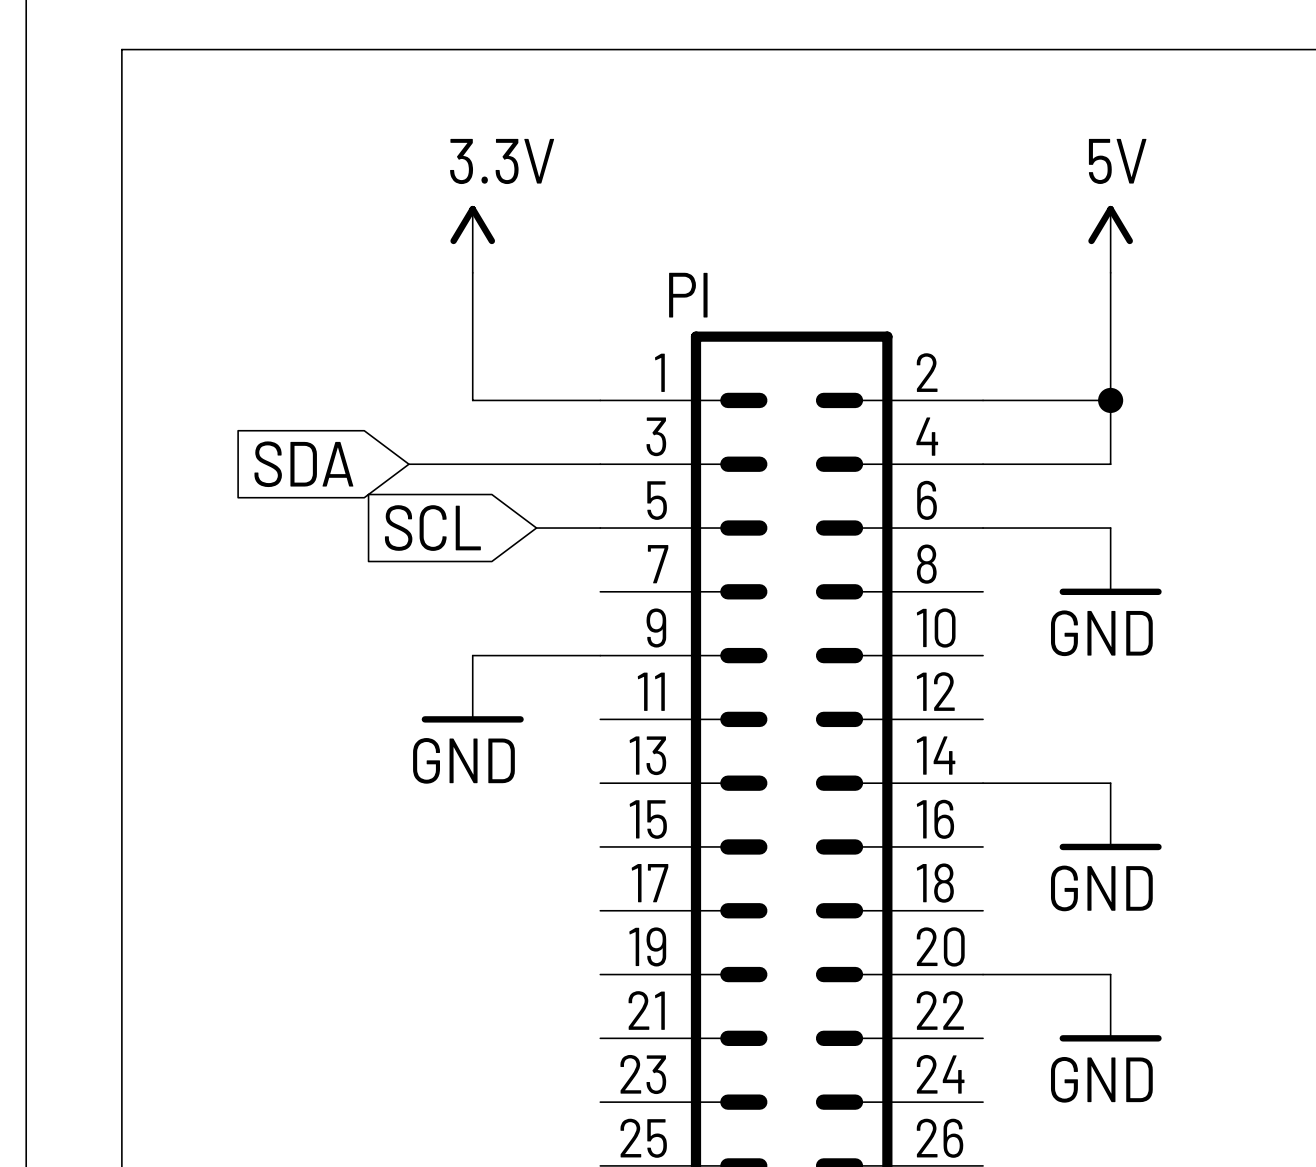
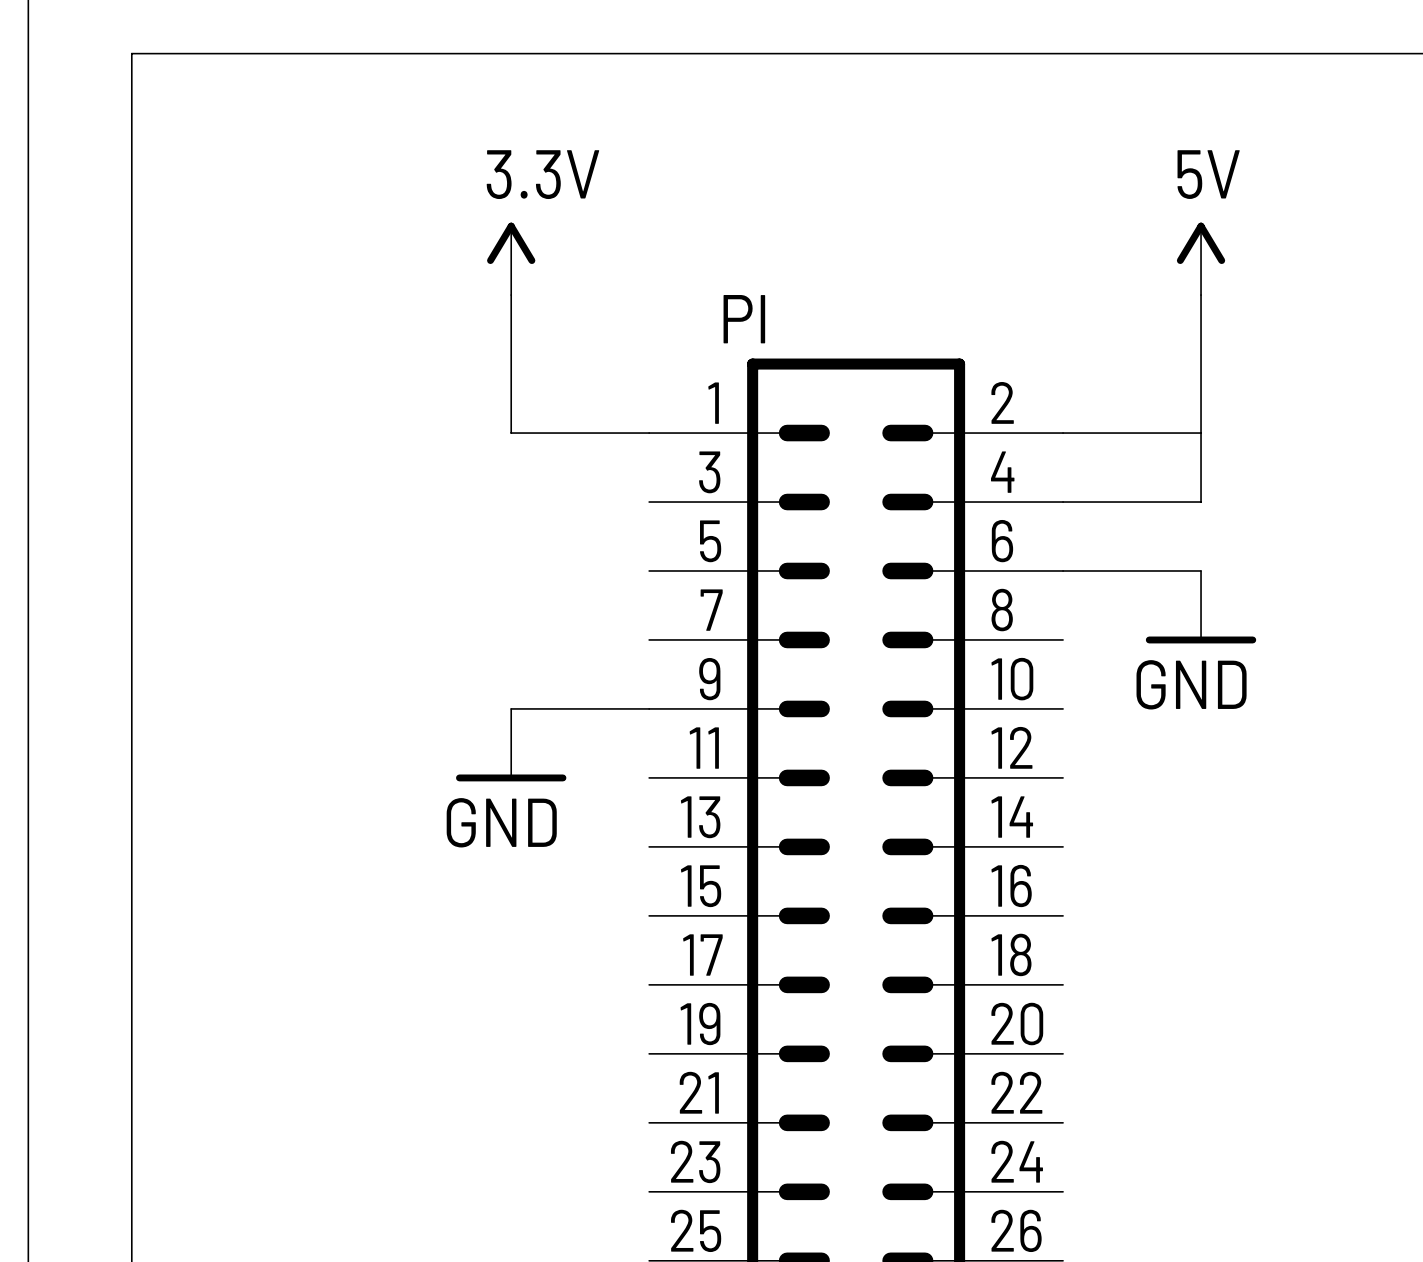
junction: (1110, 400) -> none
global label: SDA (303, 464) -> none
wire: (408, 464) (600, 464) -> none
global label: SCL (432, 528) -> none
wire: (536, 528) (600, 528) -> none
wire: (983, 783) (1110, 783) -> none
power symbol: GND (1110, 816) -> none
wire: (983, 974) (1110, 974) -> none
power symbol: GND (1110, 1008) -> none

